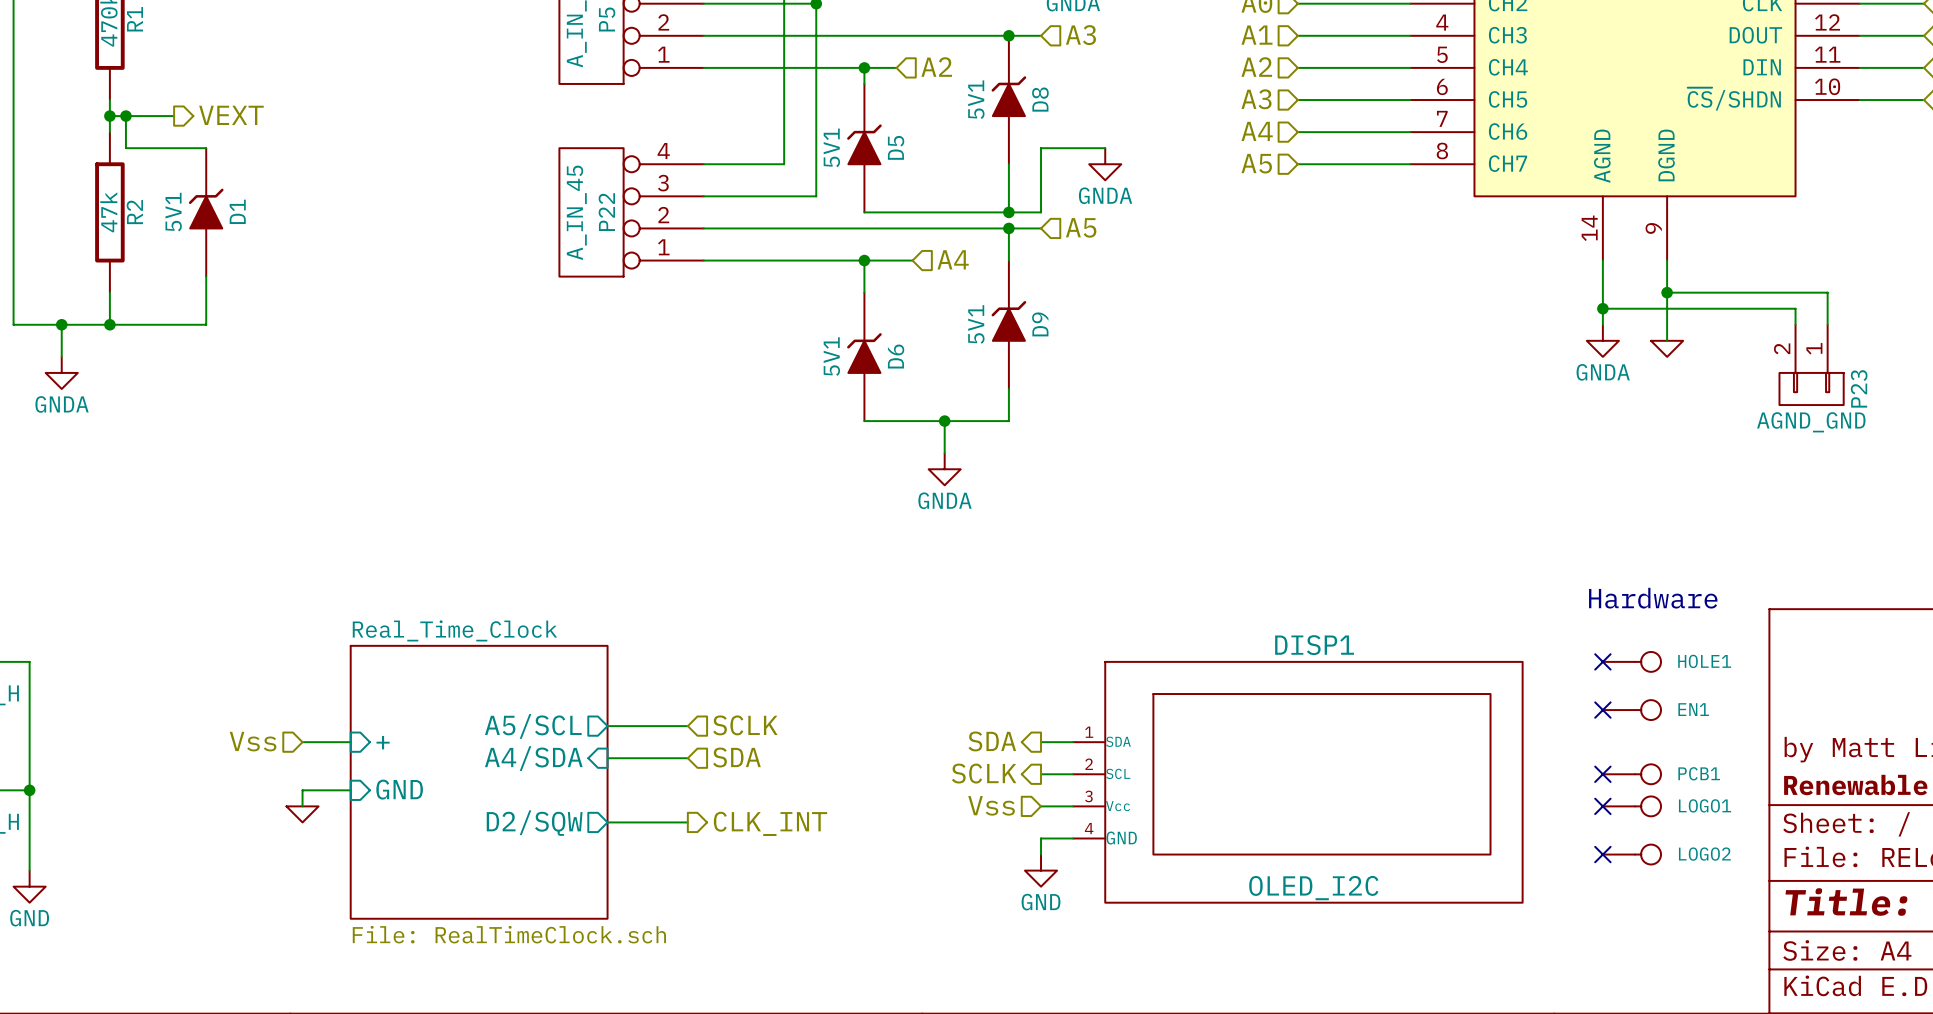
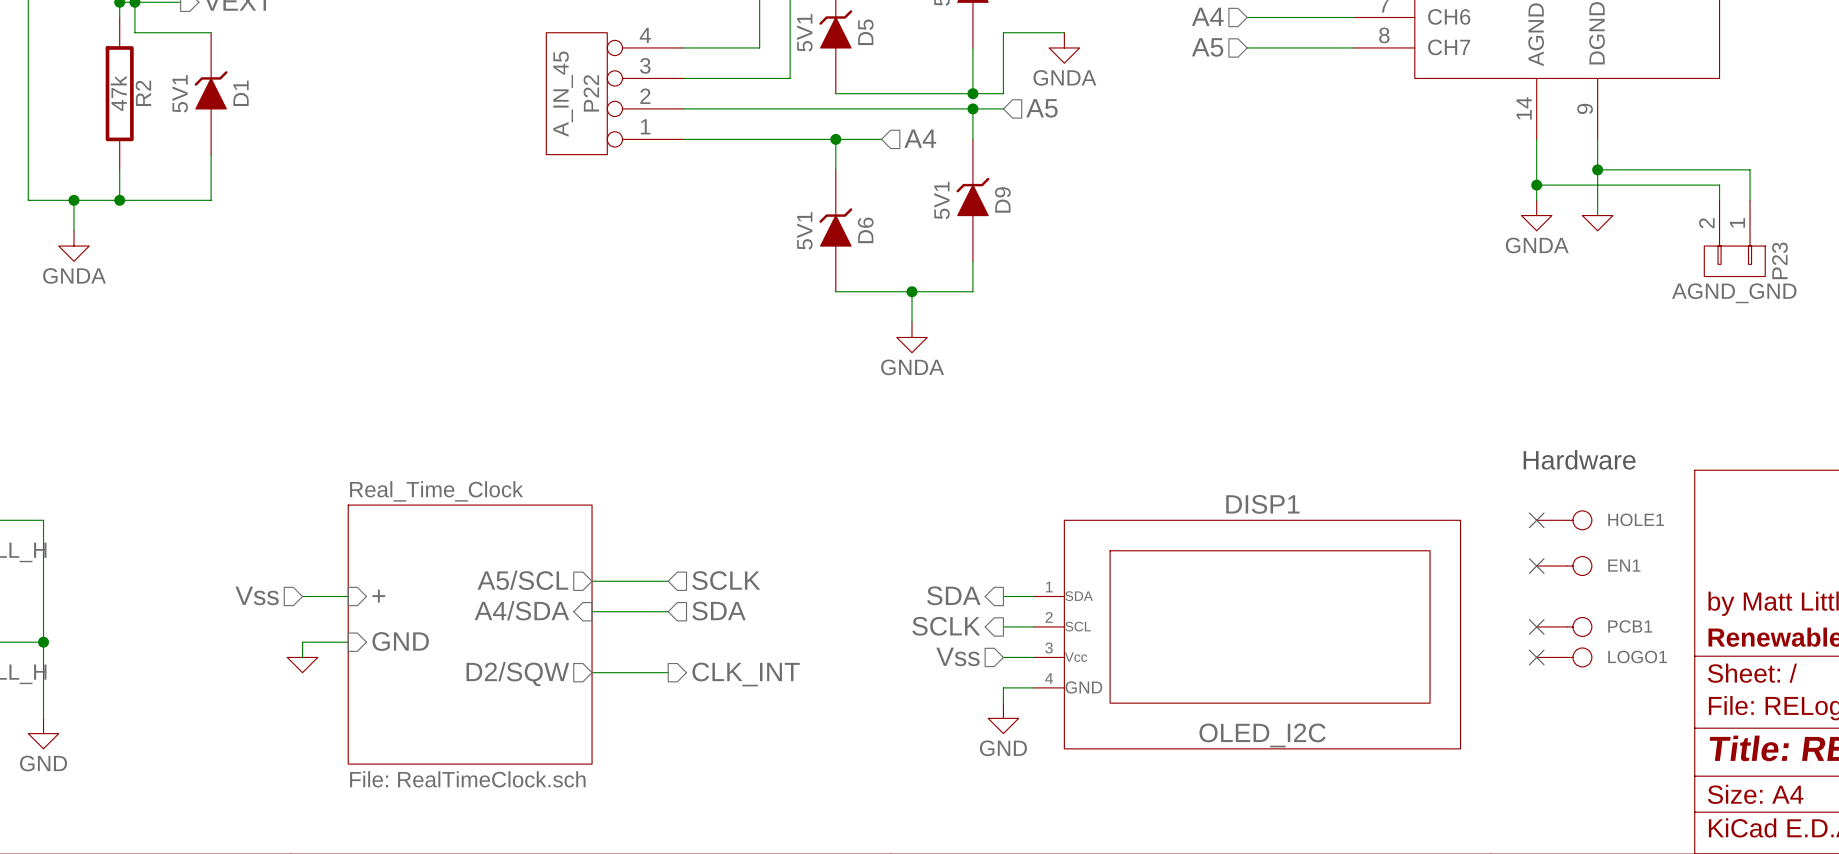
no-connect mark: (1602, 854) -> none
LOGO2: (1631, 854) -> none

